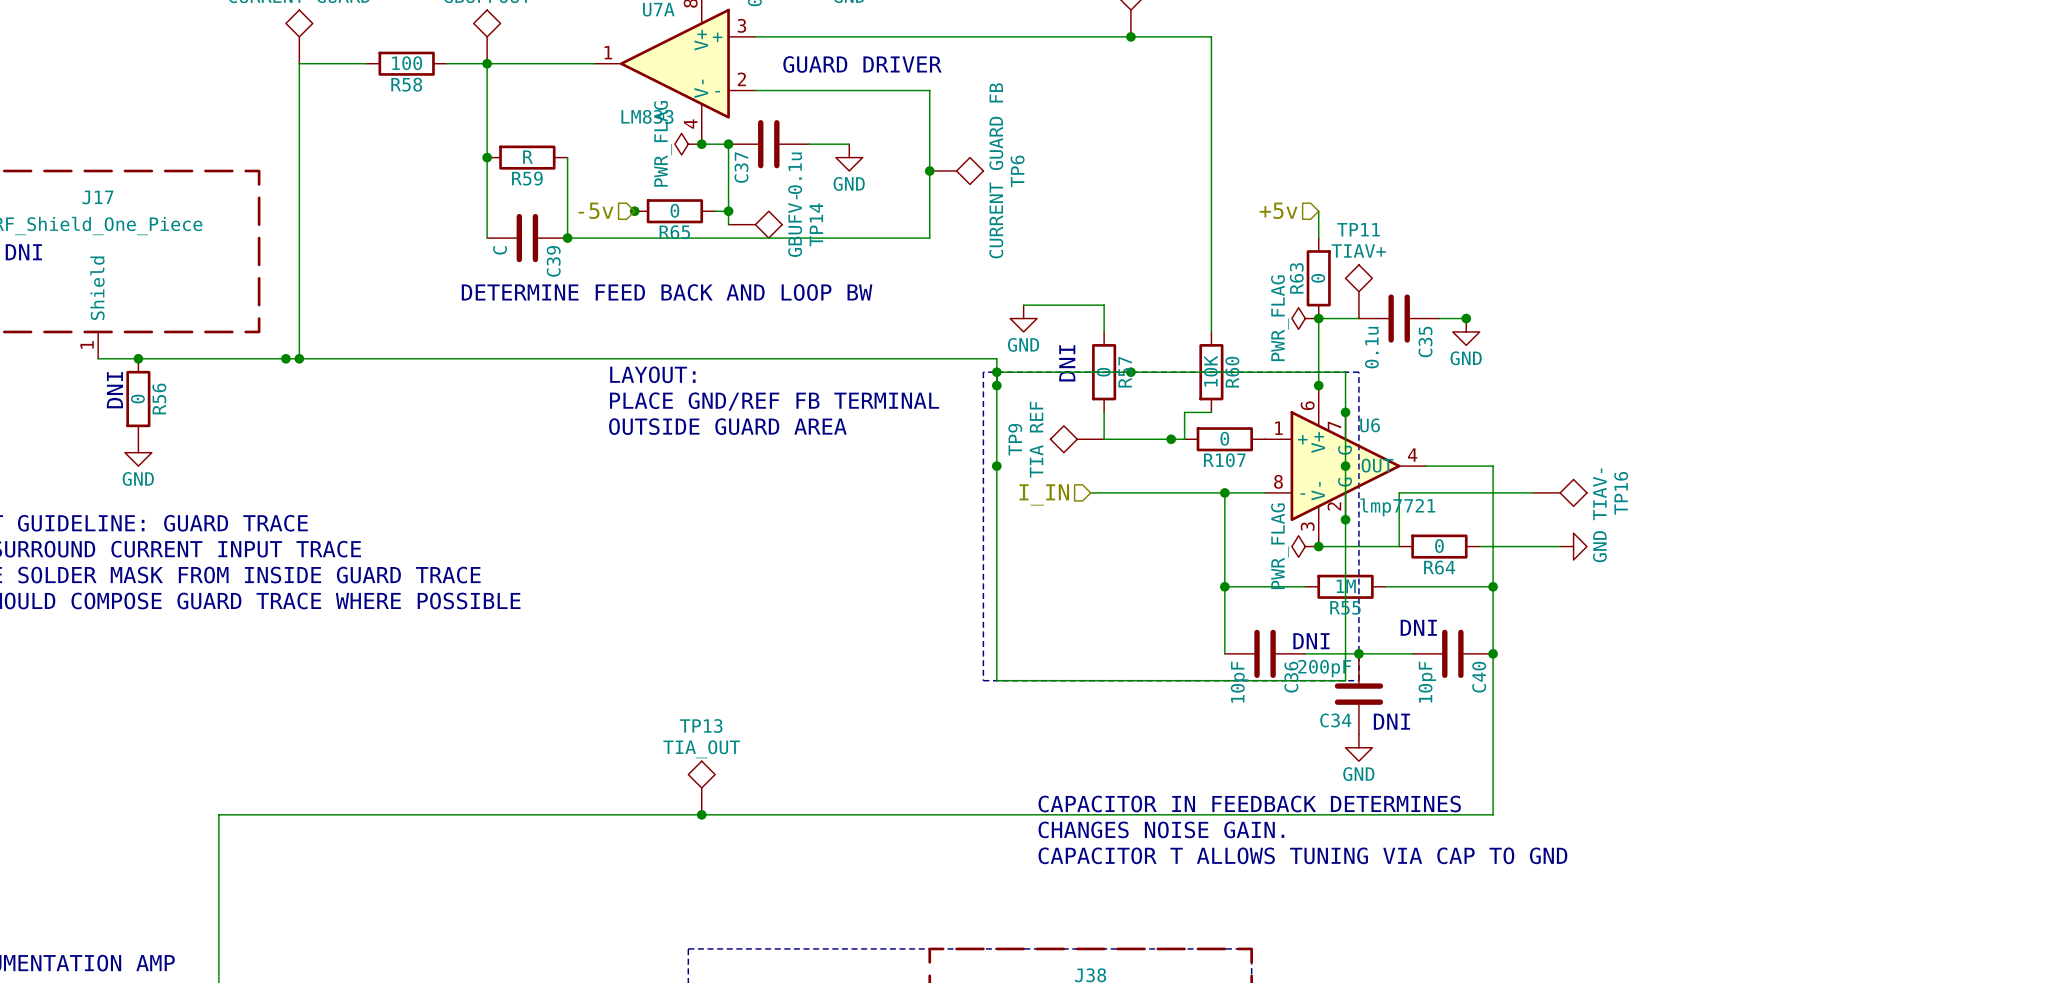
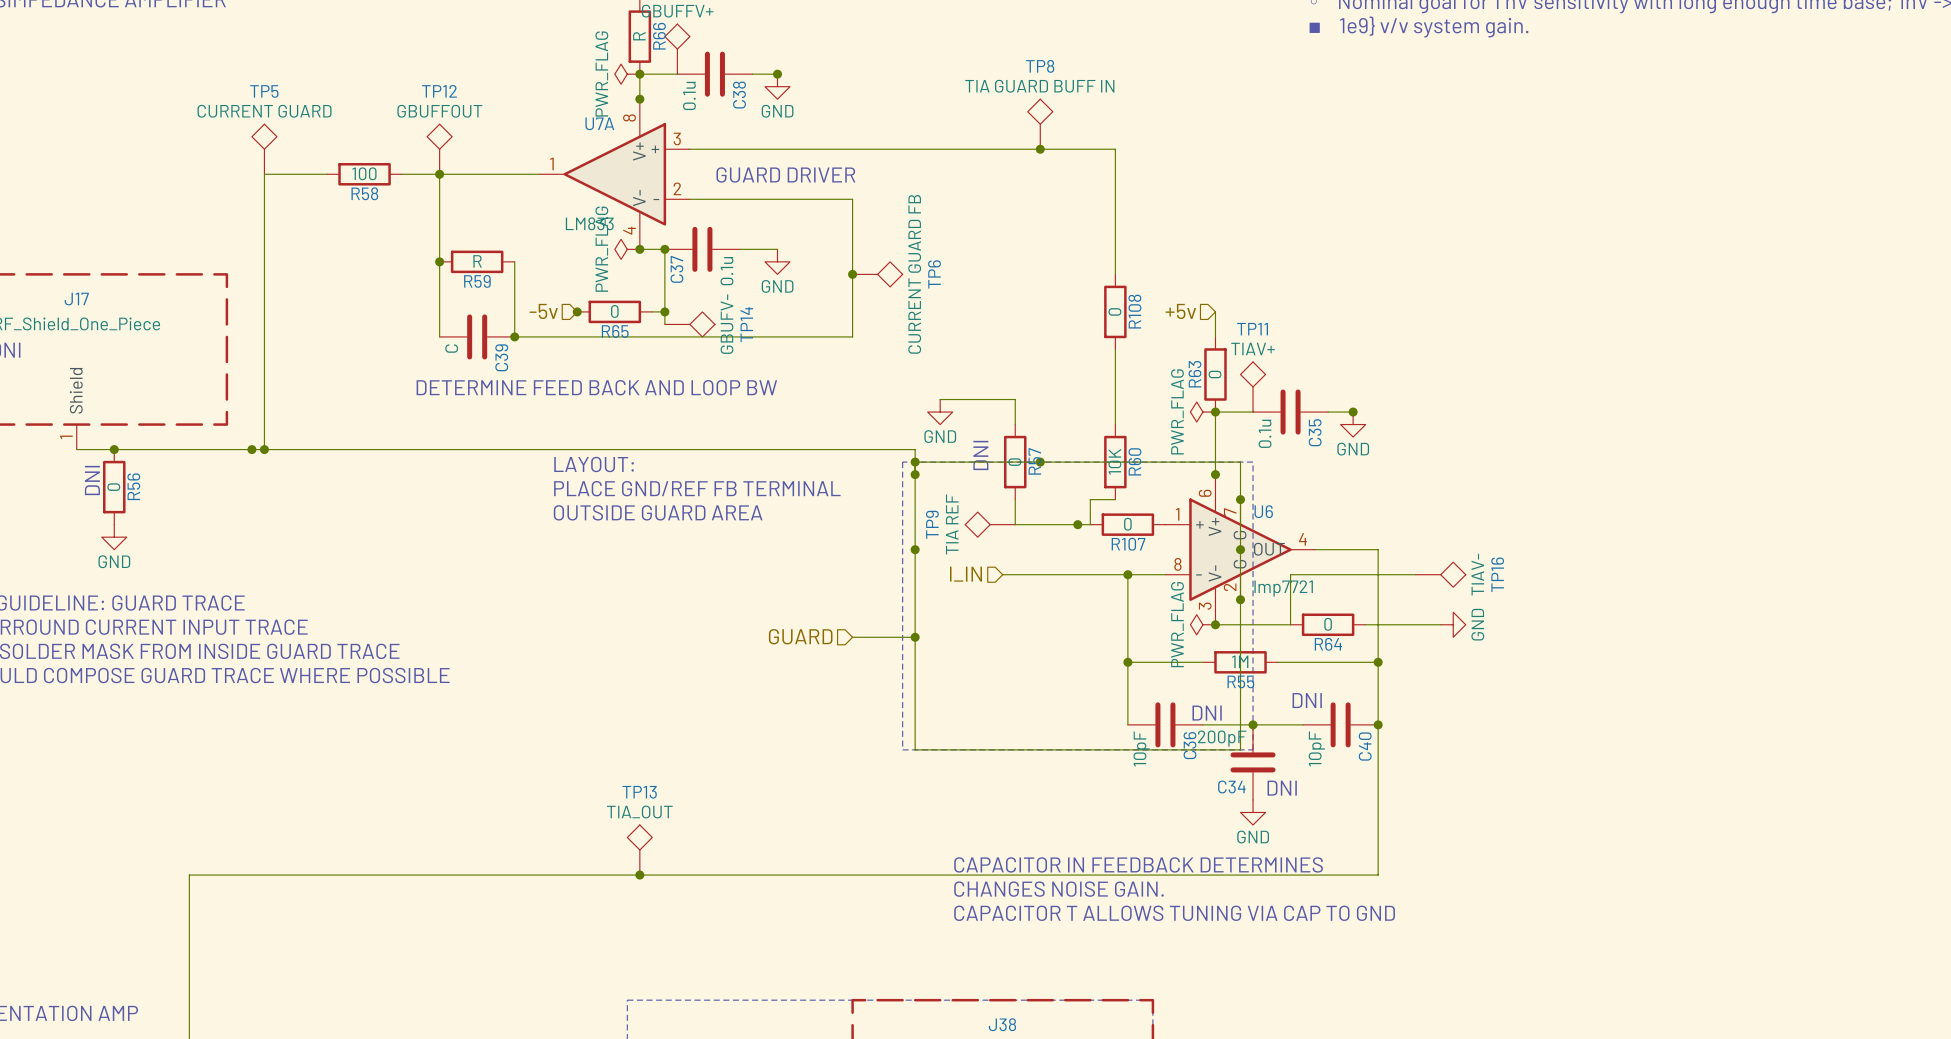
wire: (1211, 171) (1211, 251) -> none
R108: none -> 0 (1115, 311)
hierarchical label: none -> GUARD (800, 636)
wire: none -> (852, 637) (915, 637)
junction: none -> (915, 637)

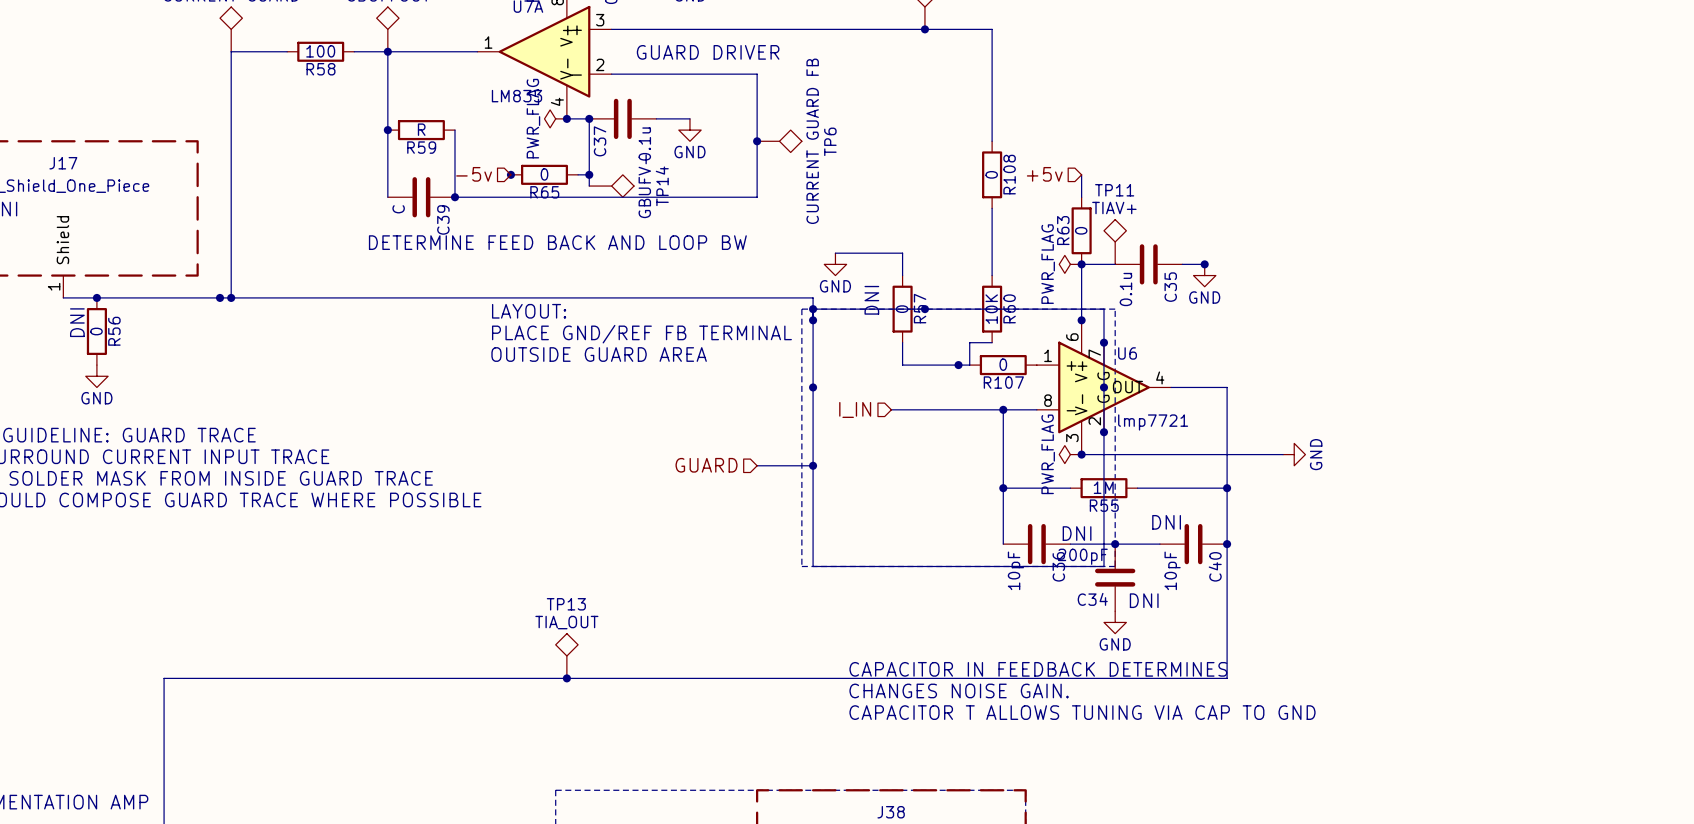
TP9: TIA REF (990, 524) -> none
wire: (1415, 574) (1290, 574) (1290, 624) -> (1215, 454) (1148, 454)
TP16: TIAV- (1440, 574) -> none
R64: 0 (1328, 624) -> none

